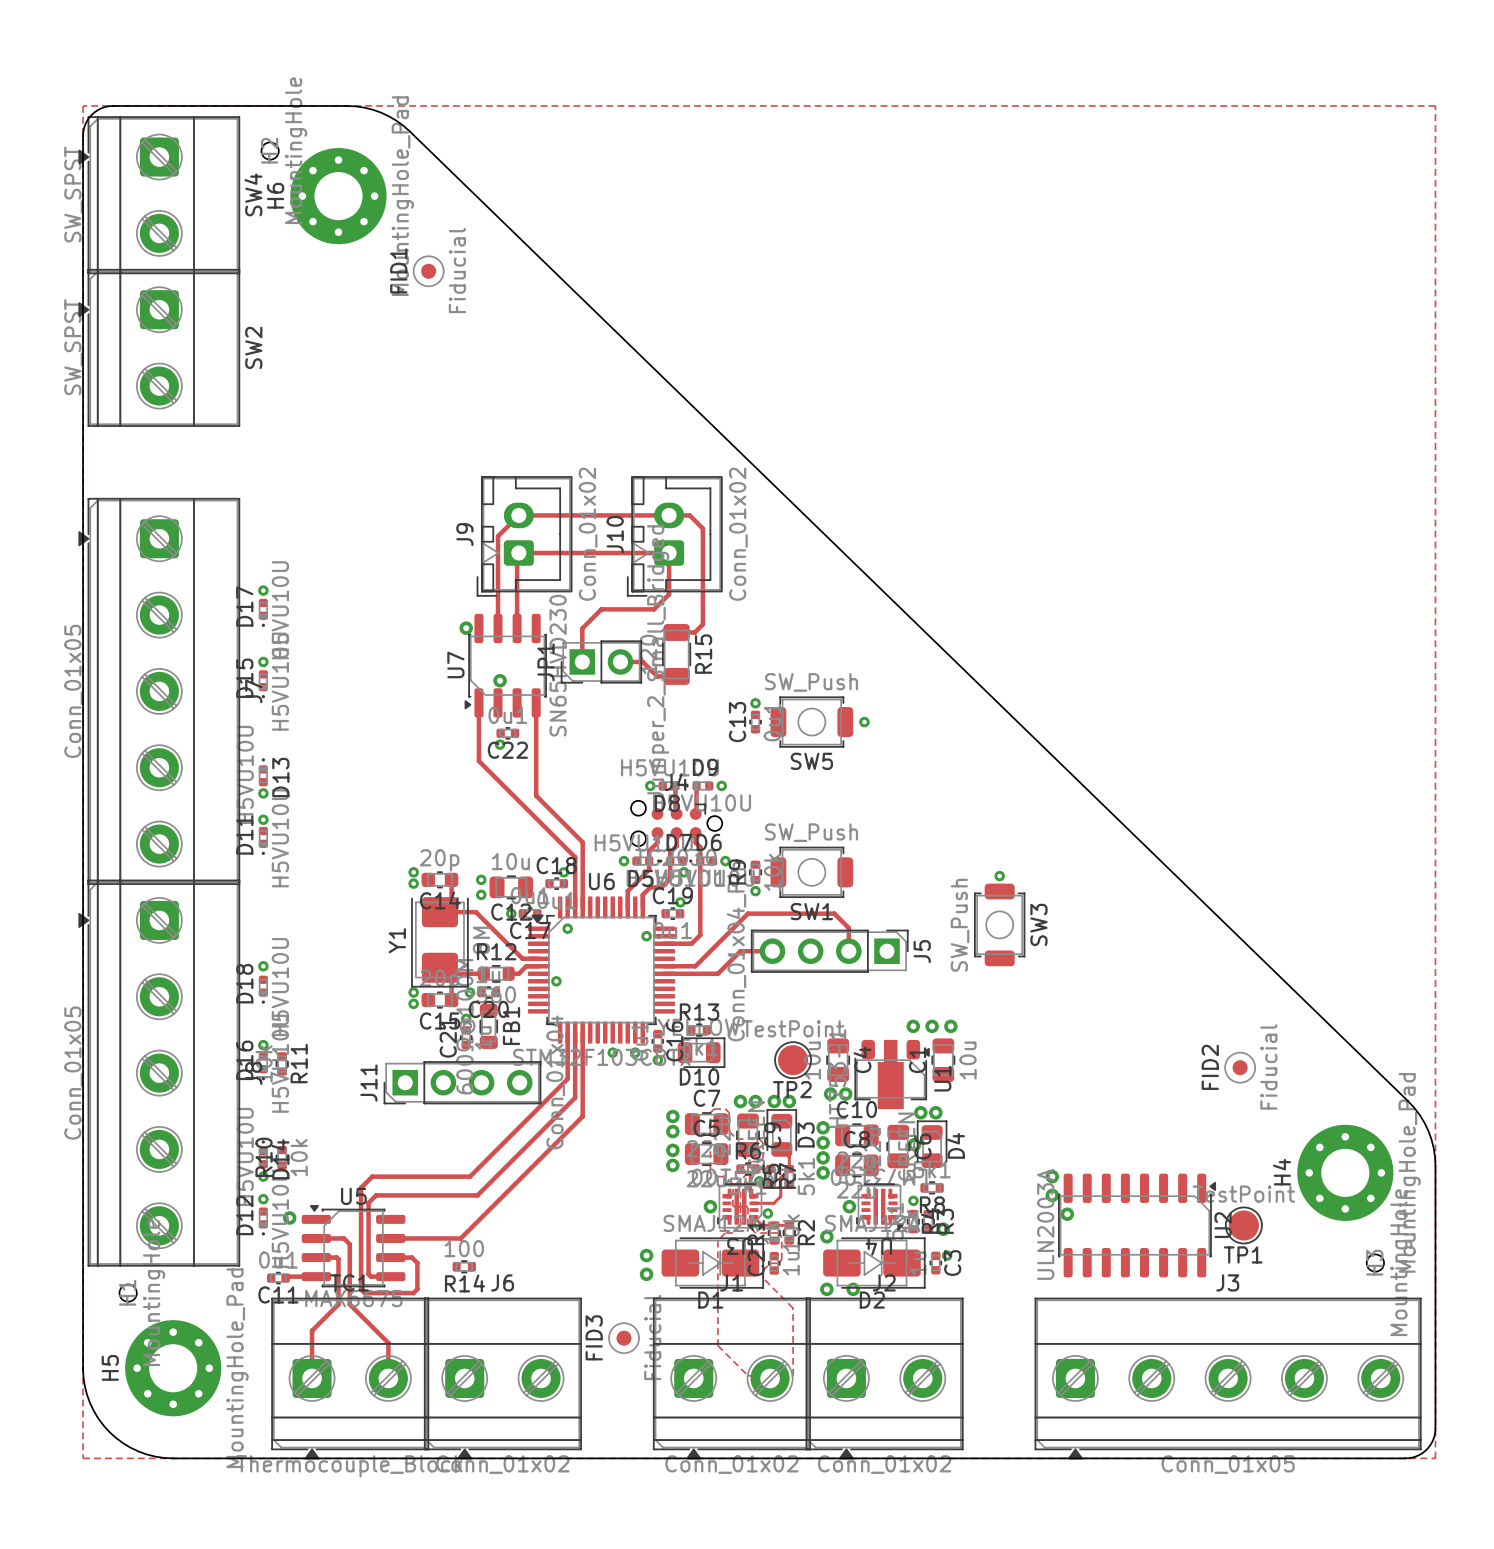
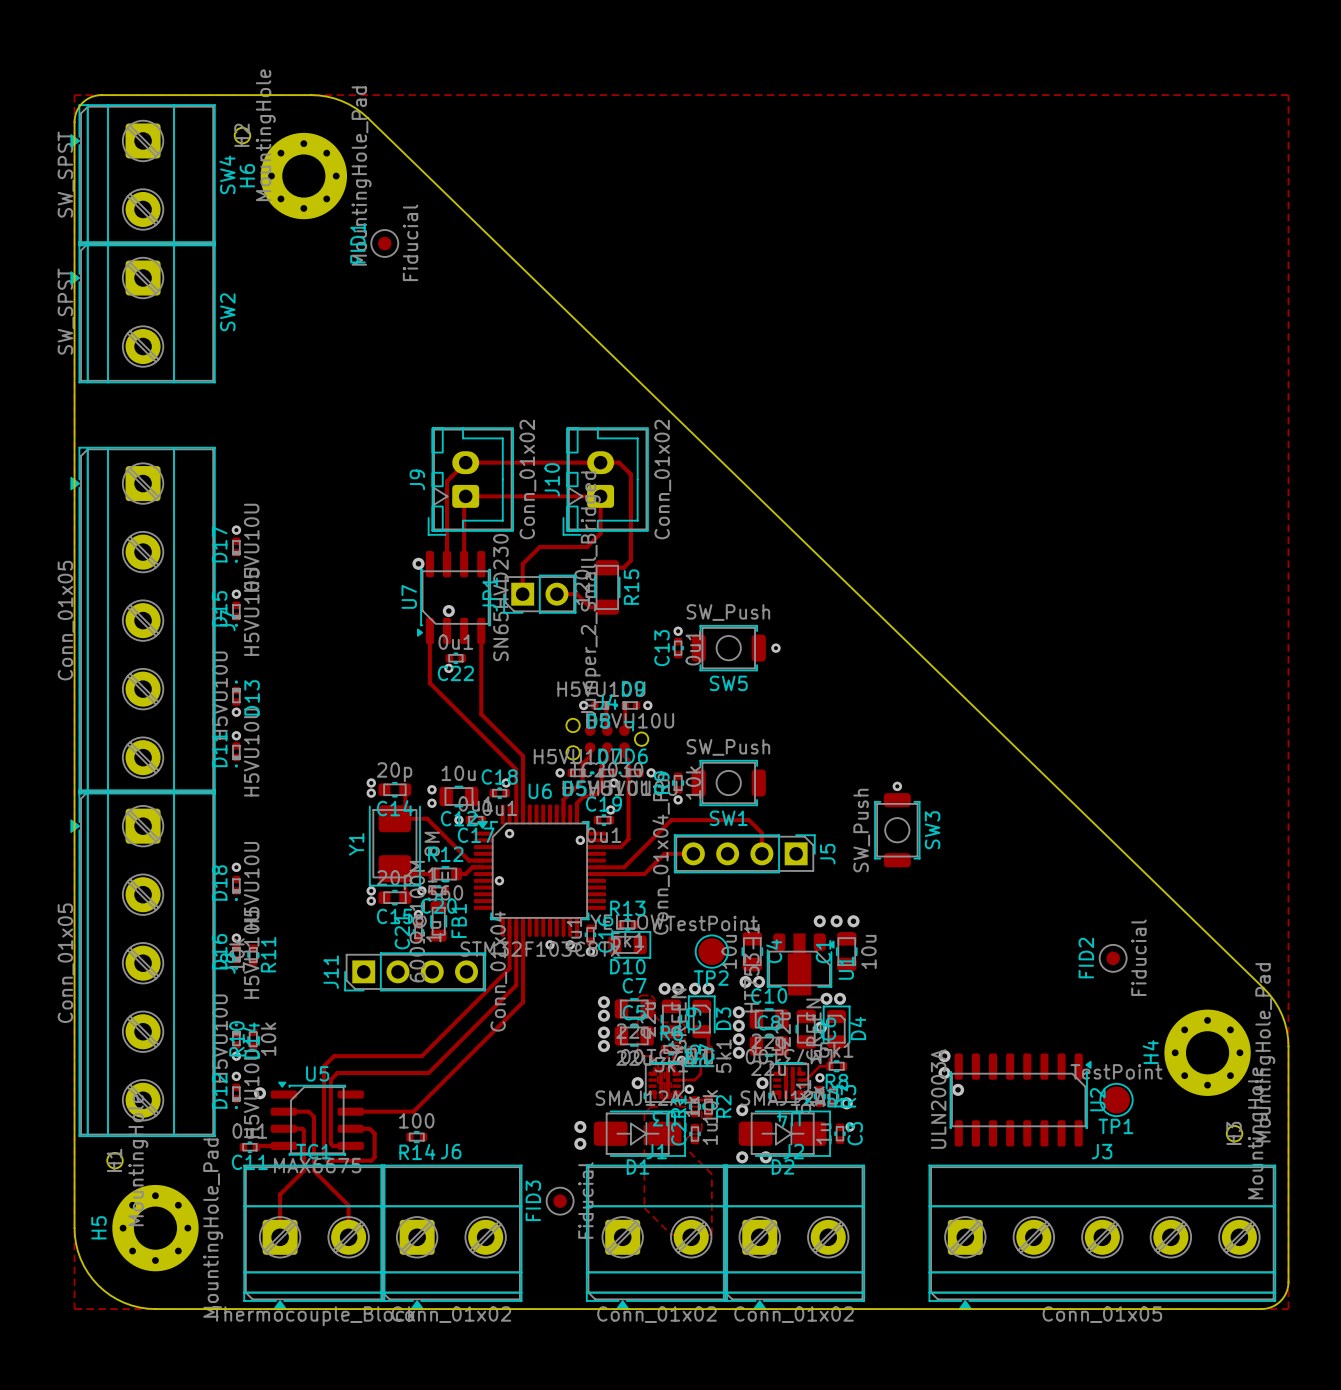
track: none -> (836, 1041) (836, 1052) (829, 1059) (829, 1066) (819, 1066) (805, 1080) (801, 1080)

